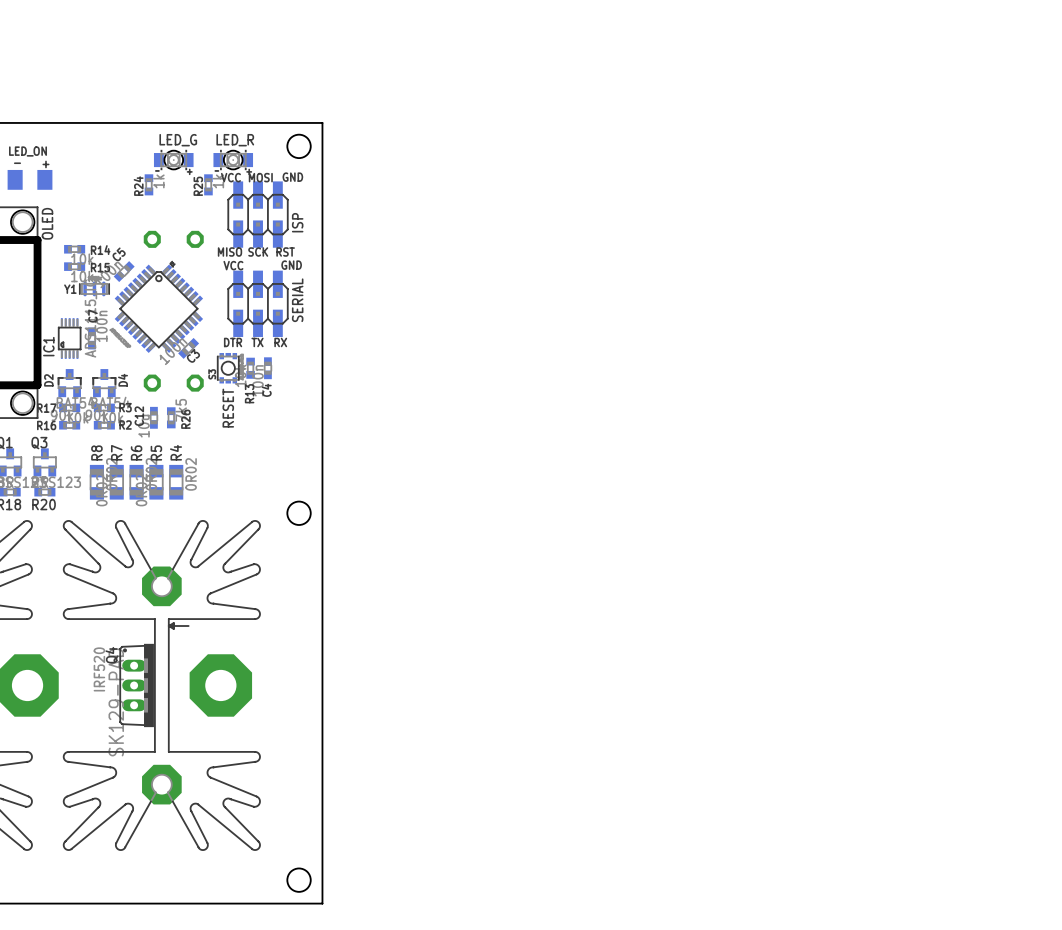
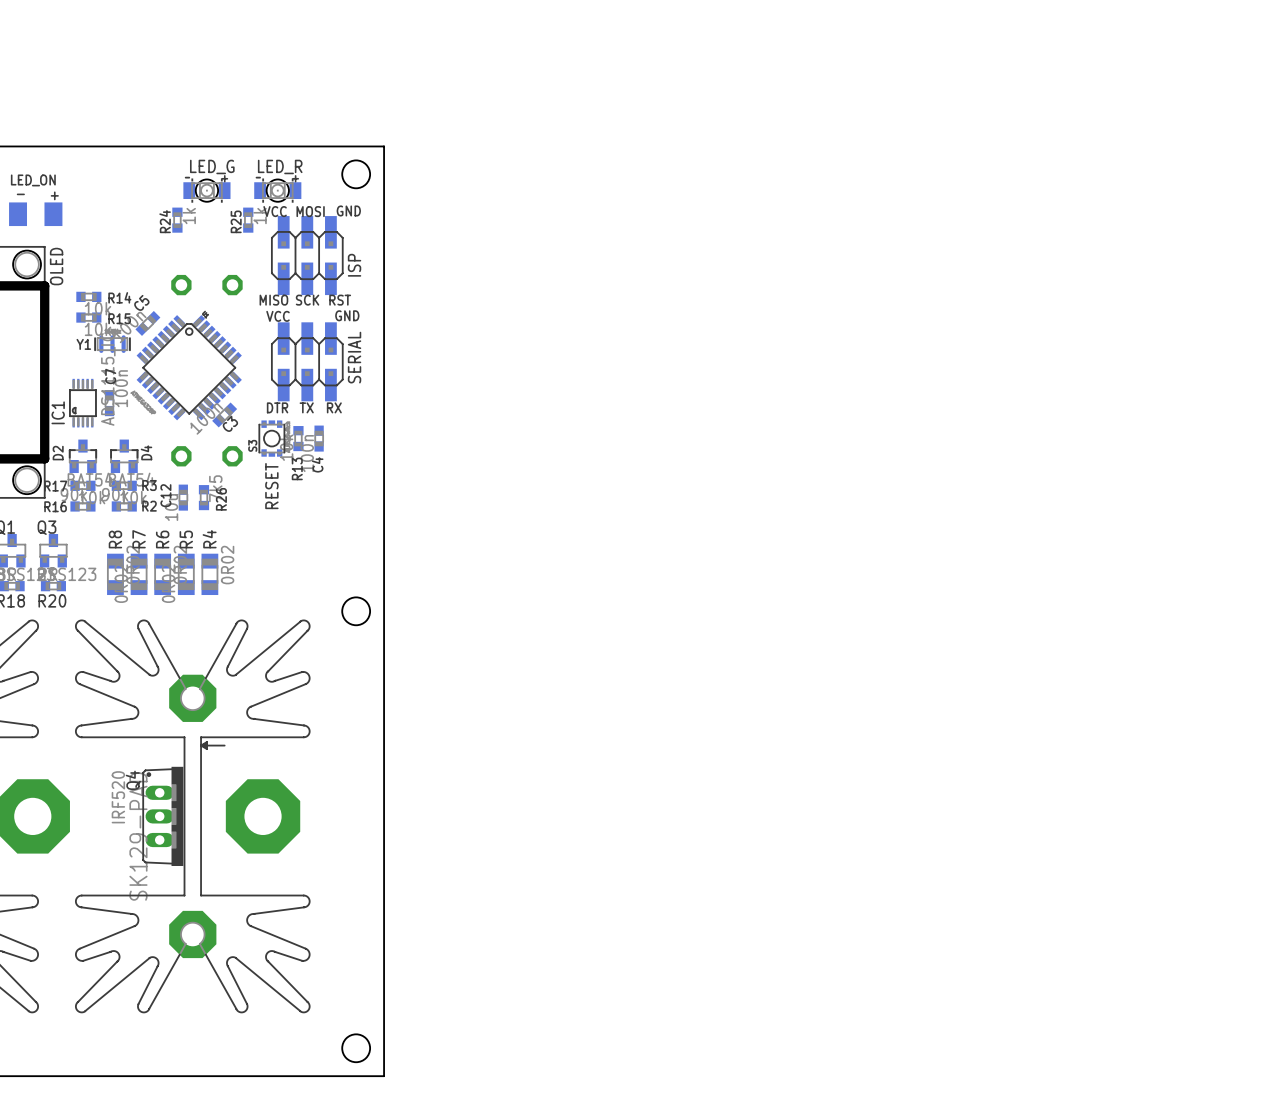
LED_G footprint: [153, 149, 194, 172] -> [183, 177, 231, 204]
LED_R footprint: [213, 149, 254, 172] -> [254, 177, 302, 204]

